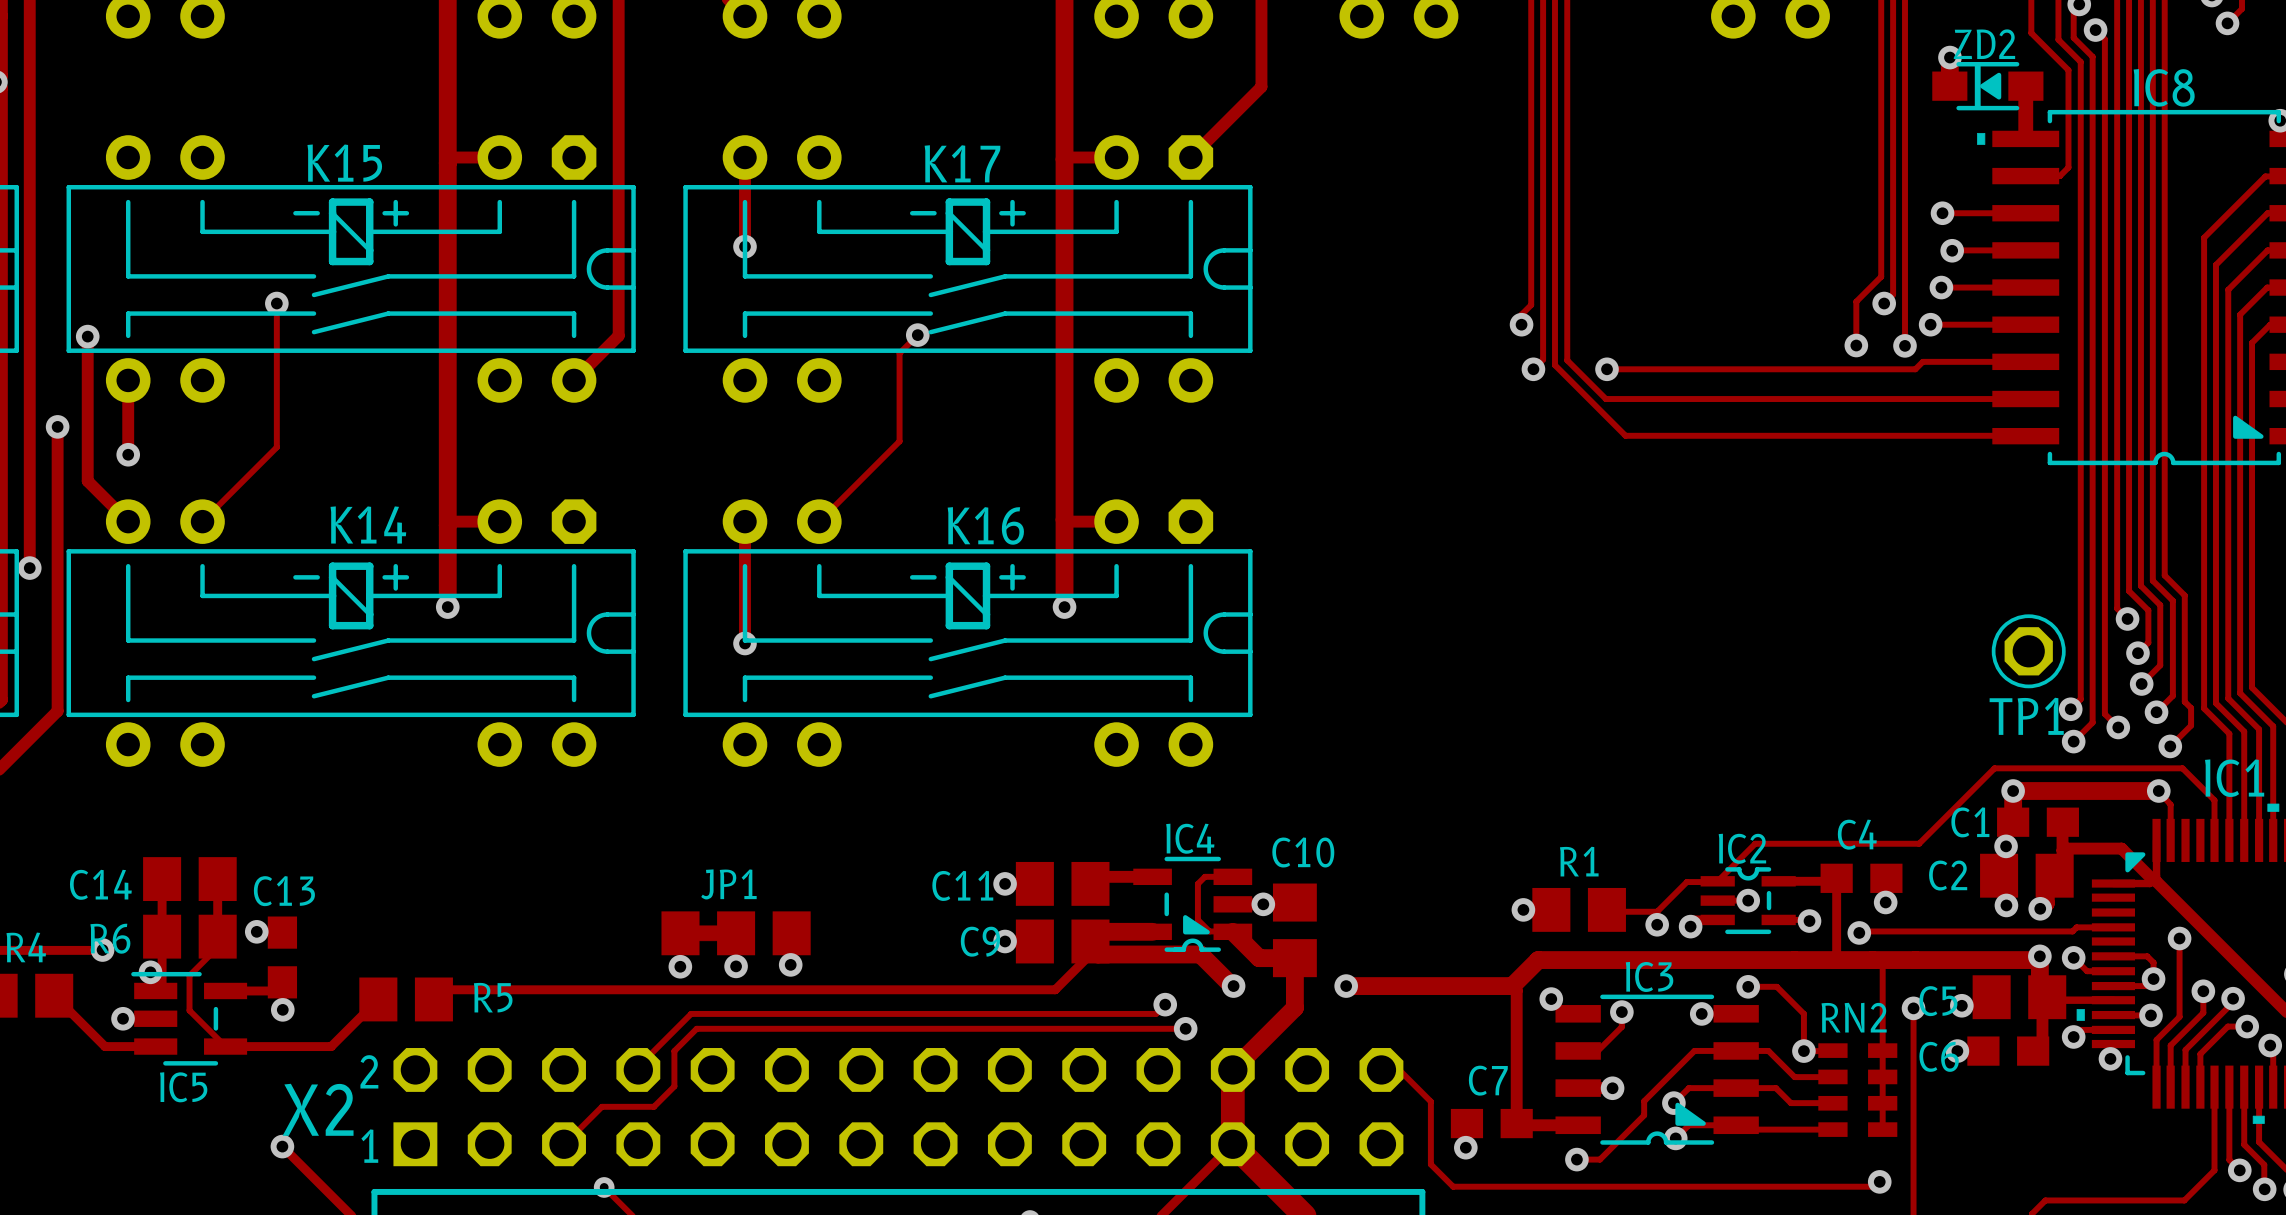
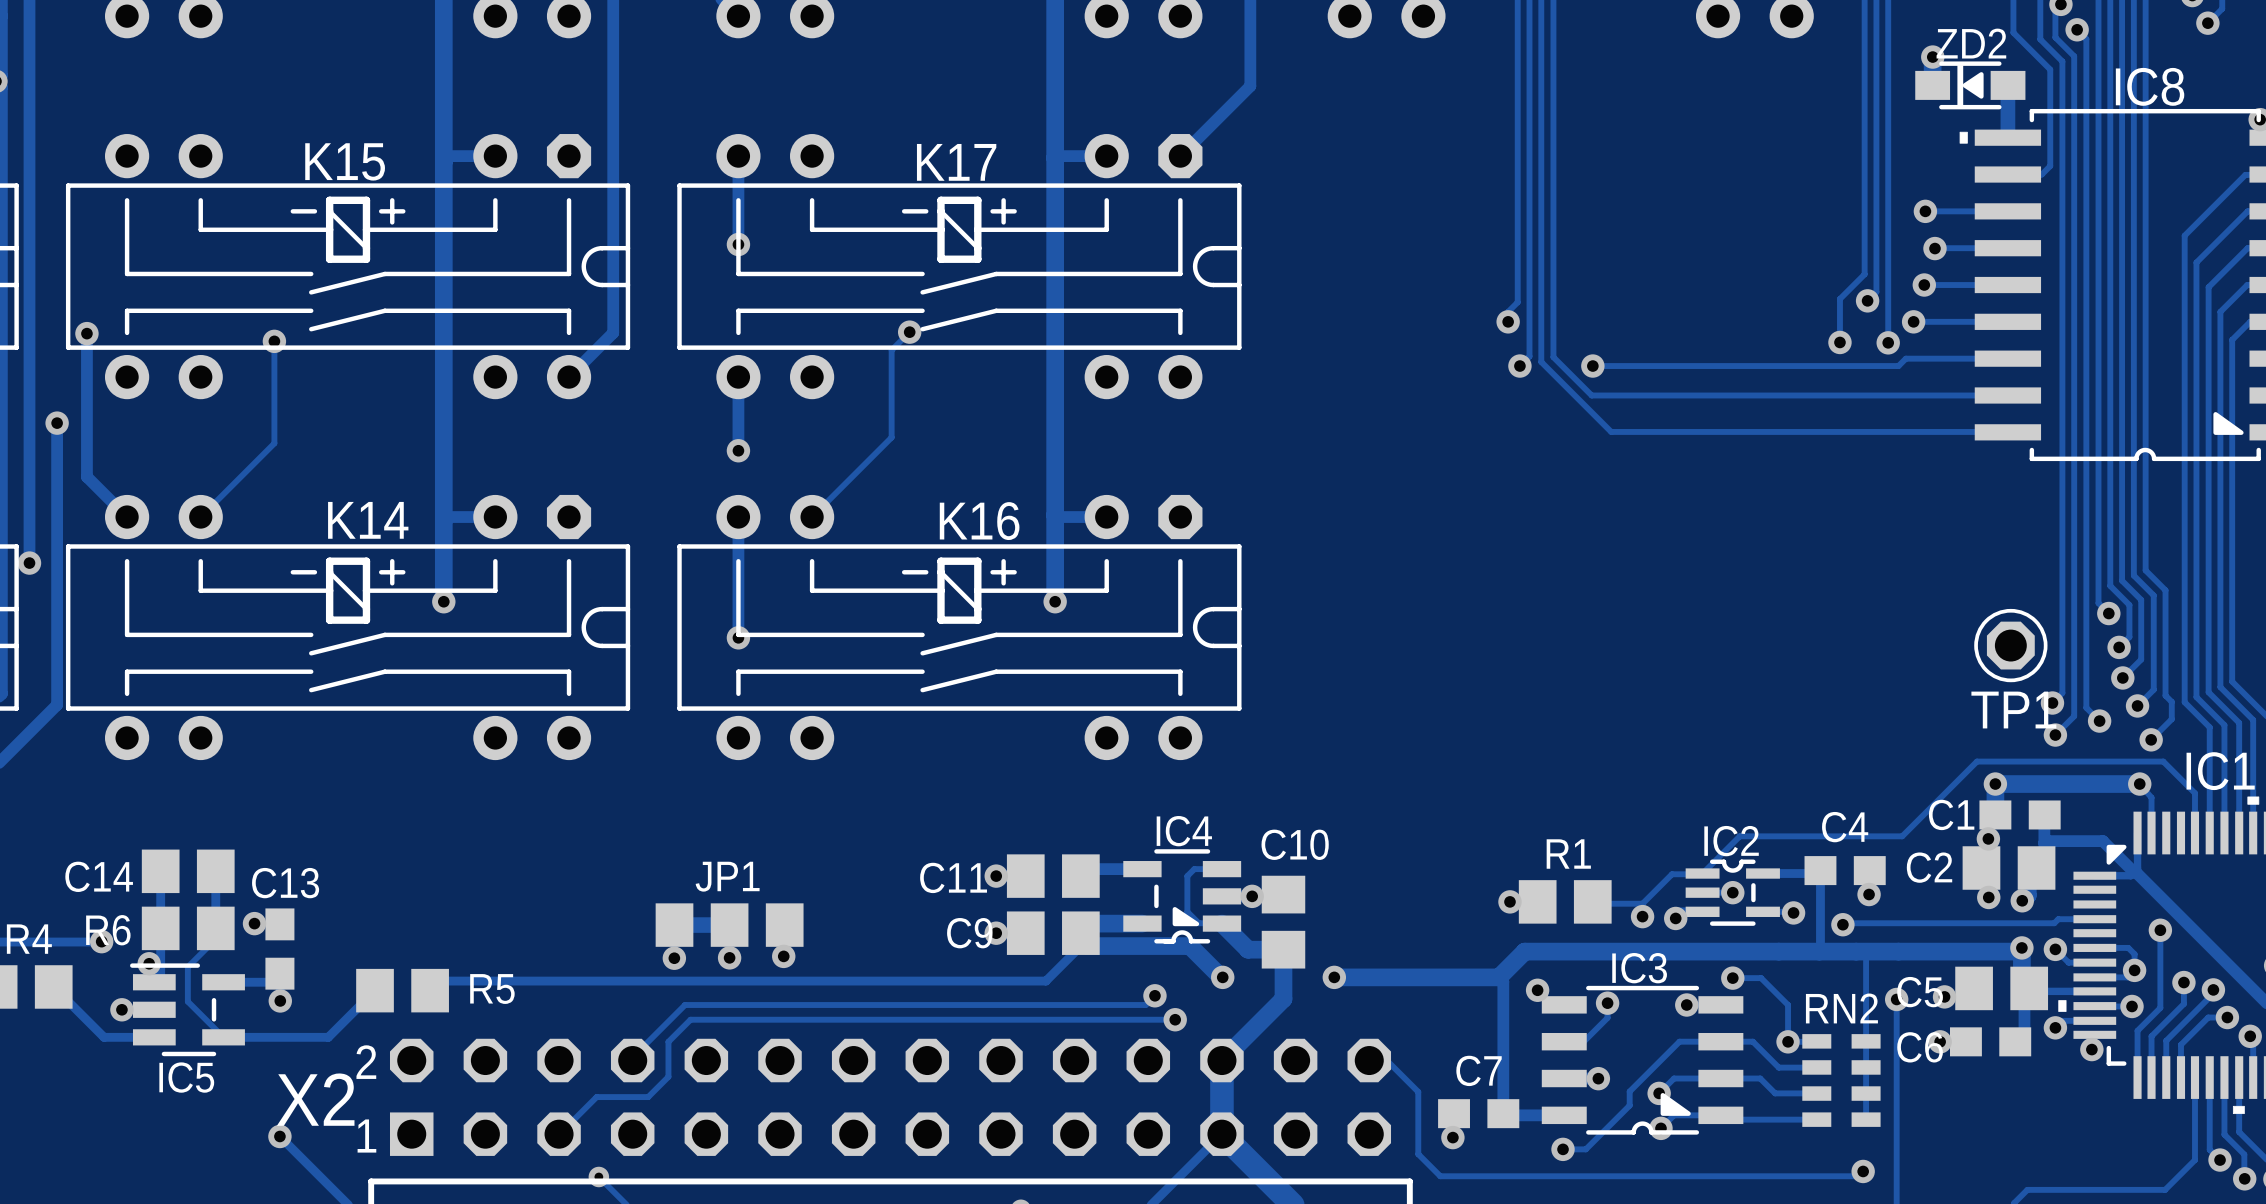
track: (276, 303) (276, 344) -> none
via position: (276, 303) -> (274, 341)
track: (128, 380) (128, 454) -> (738, 377) (738, 450)
via: (128, 454) -> none
via: none -> (738, 450)

